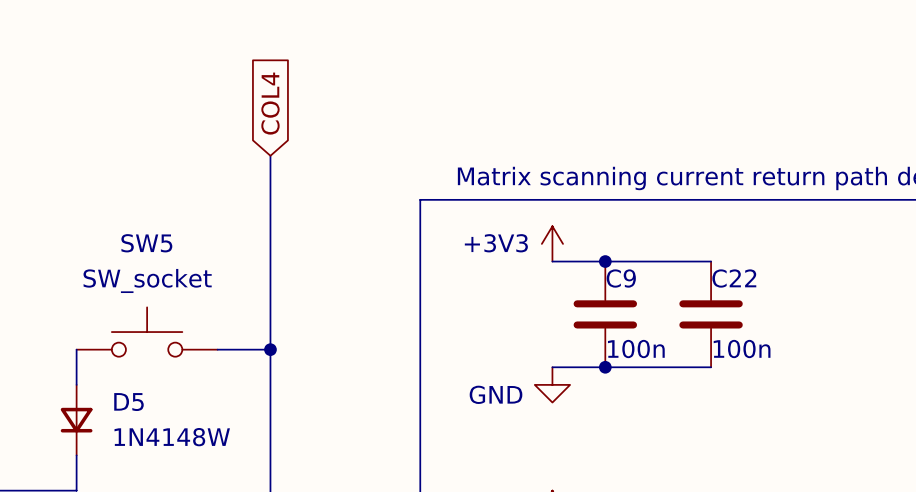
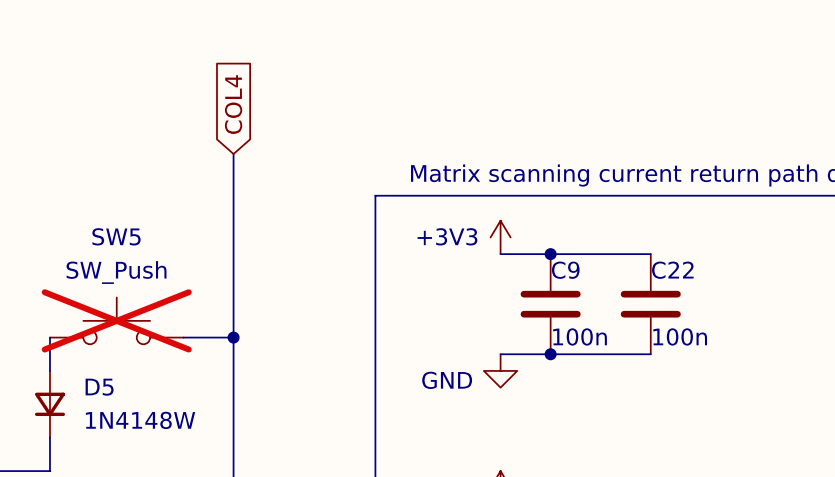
SW5 value: SW_socket (147, 280) -> SW_Push (116, 272)
SW5 do-not-place cross: none -> (116, 320)

